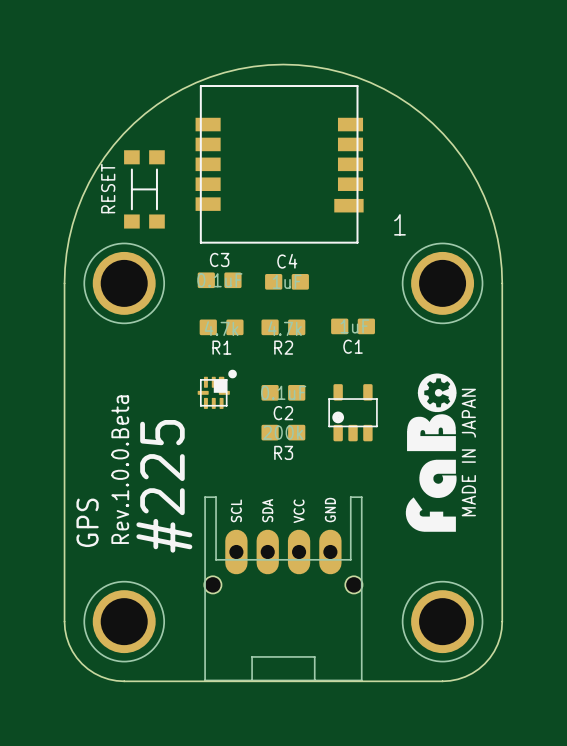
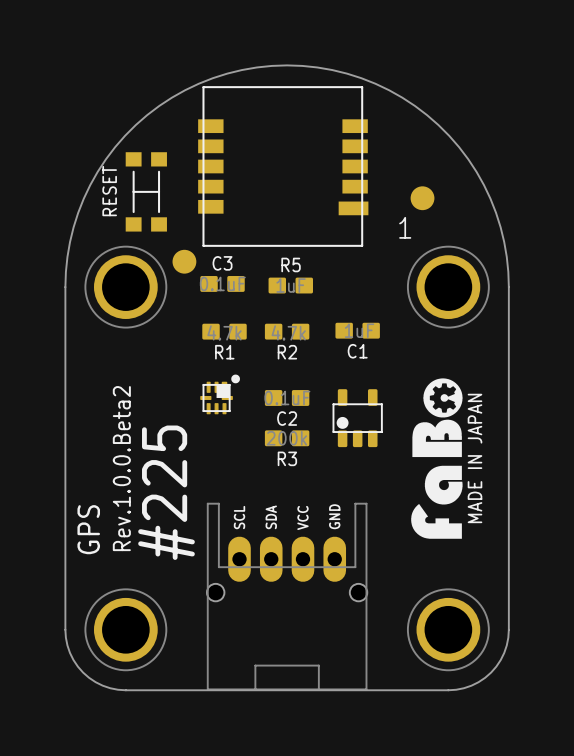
part: none -> (422, 198)
part: none -> (184, 261)
C4 name: C4 (287, 261) -> R5 (291, 264)
text: Rev.1.0.0.Beta (120, 469) -> Rev.1.0.0.Beta2 (121, 468)

